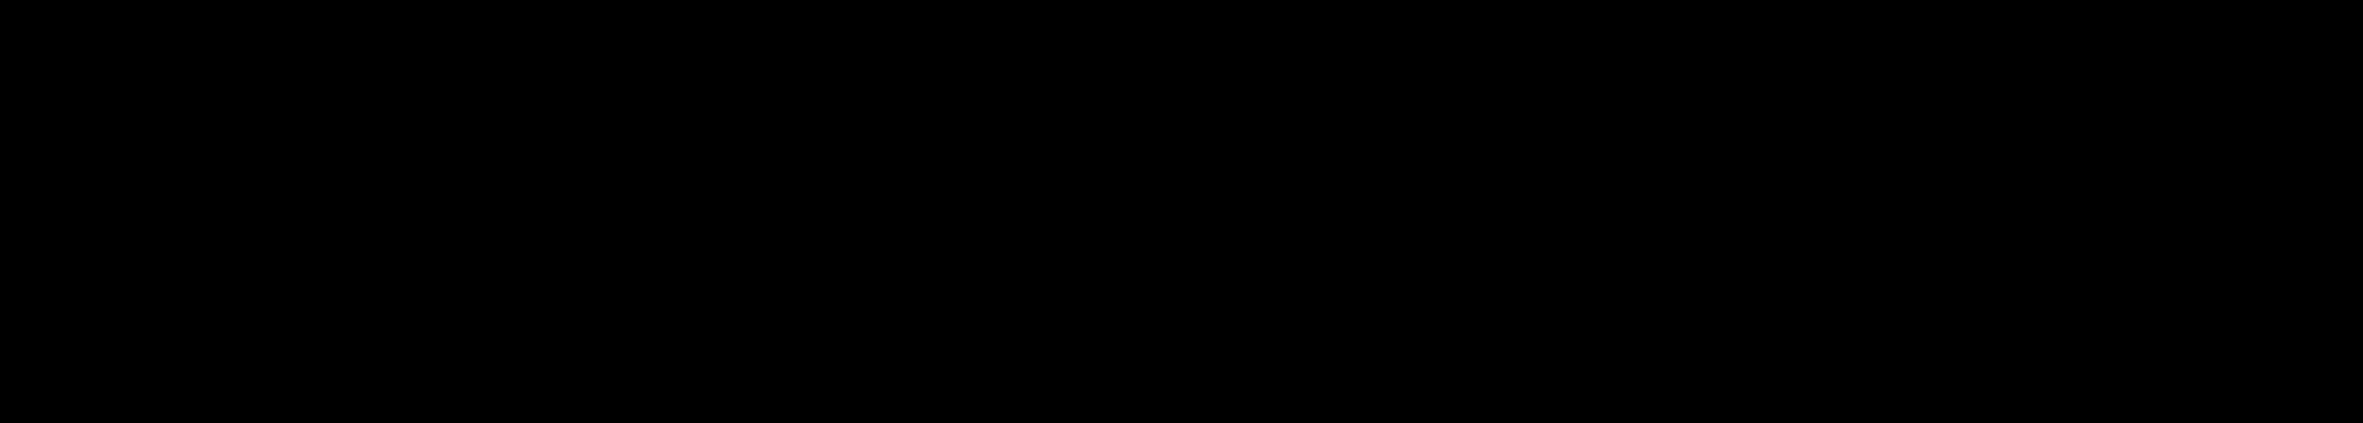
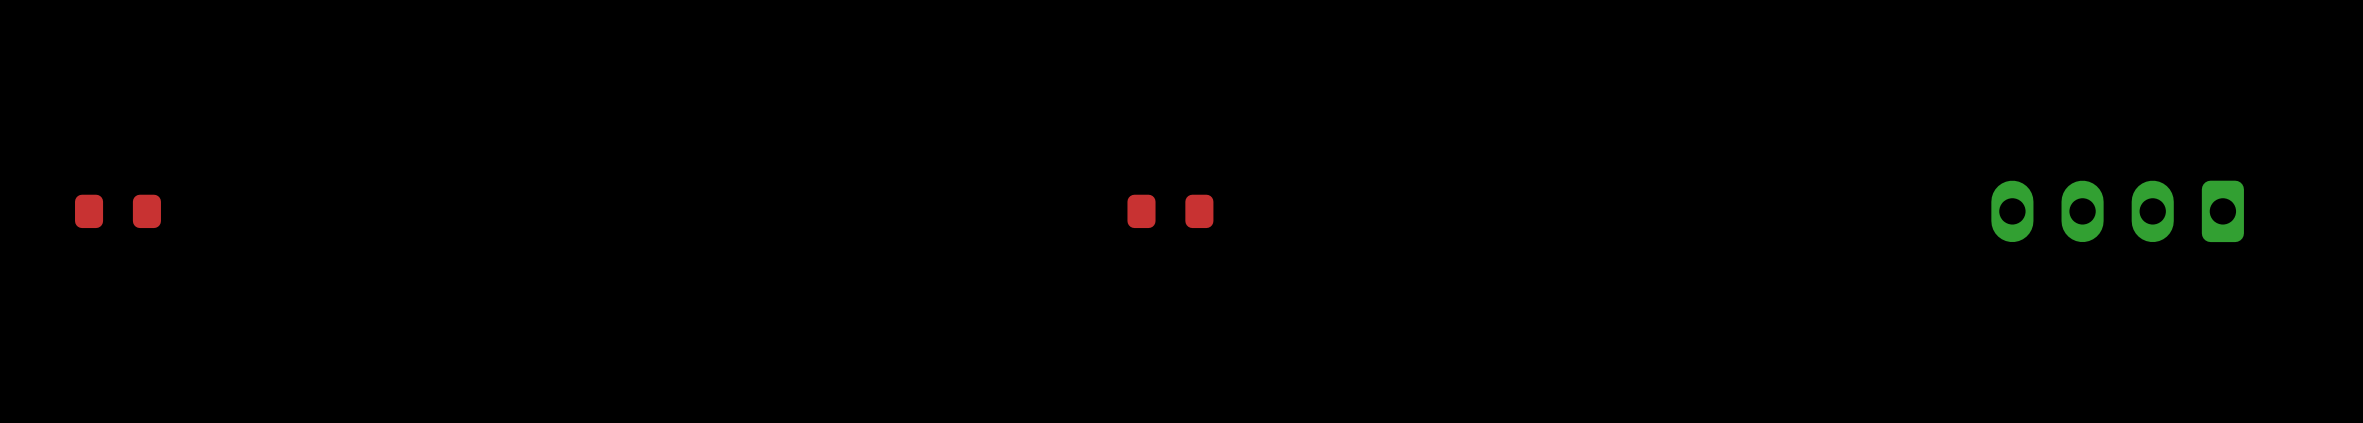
part: none -> (117, 211)
part: none -> (1170, 211)
part: none -> (2117, 211)

